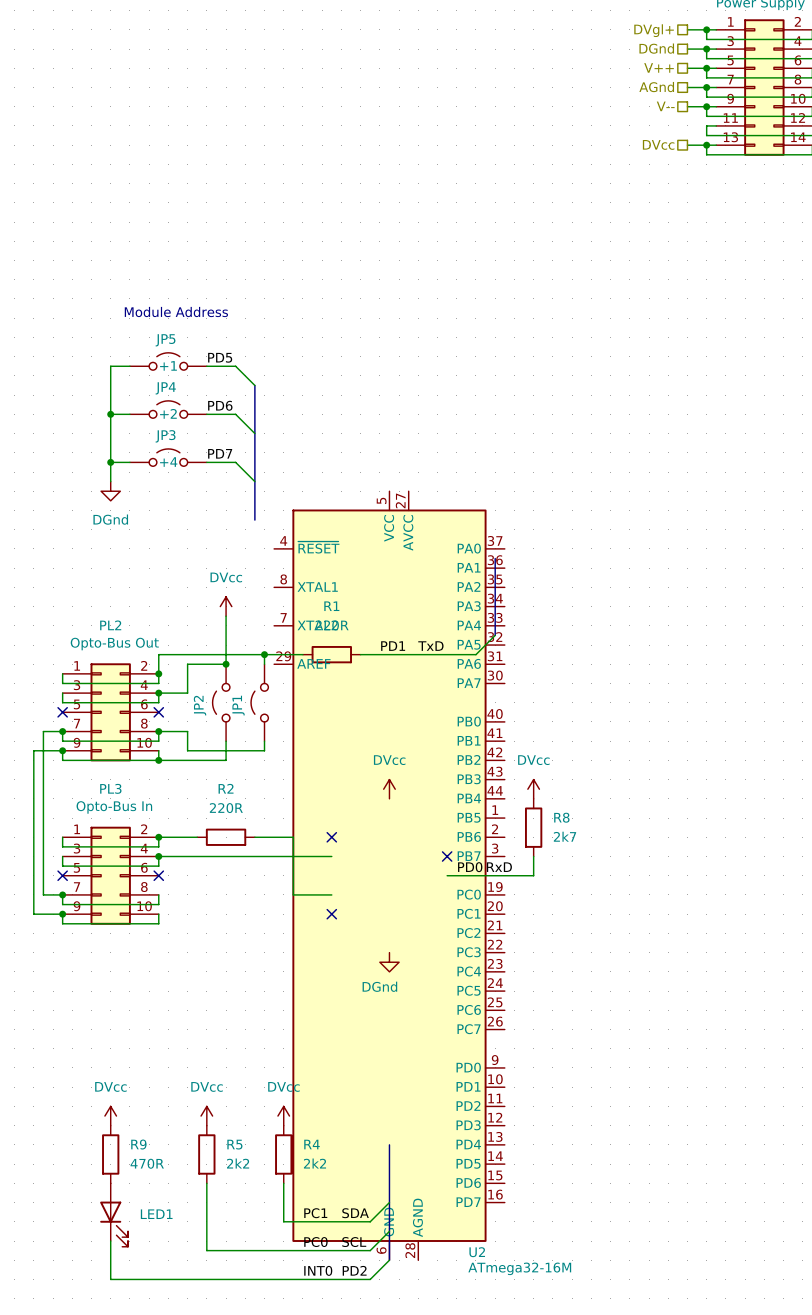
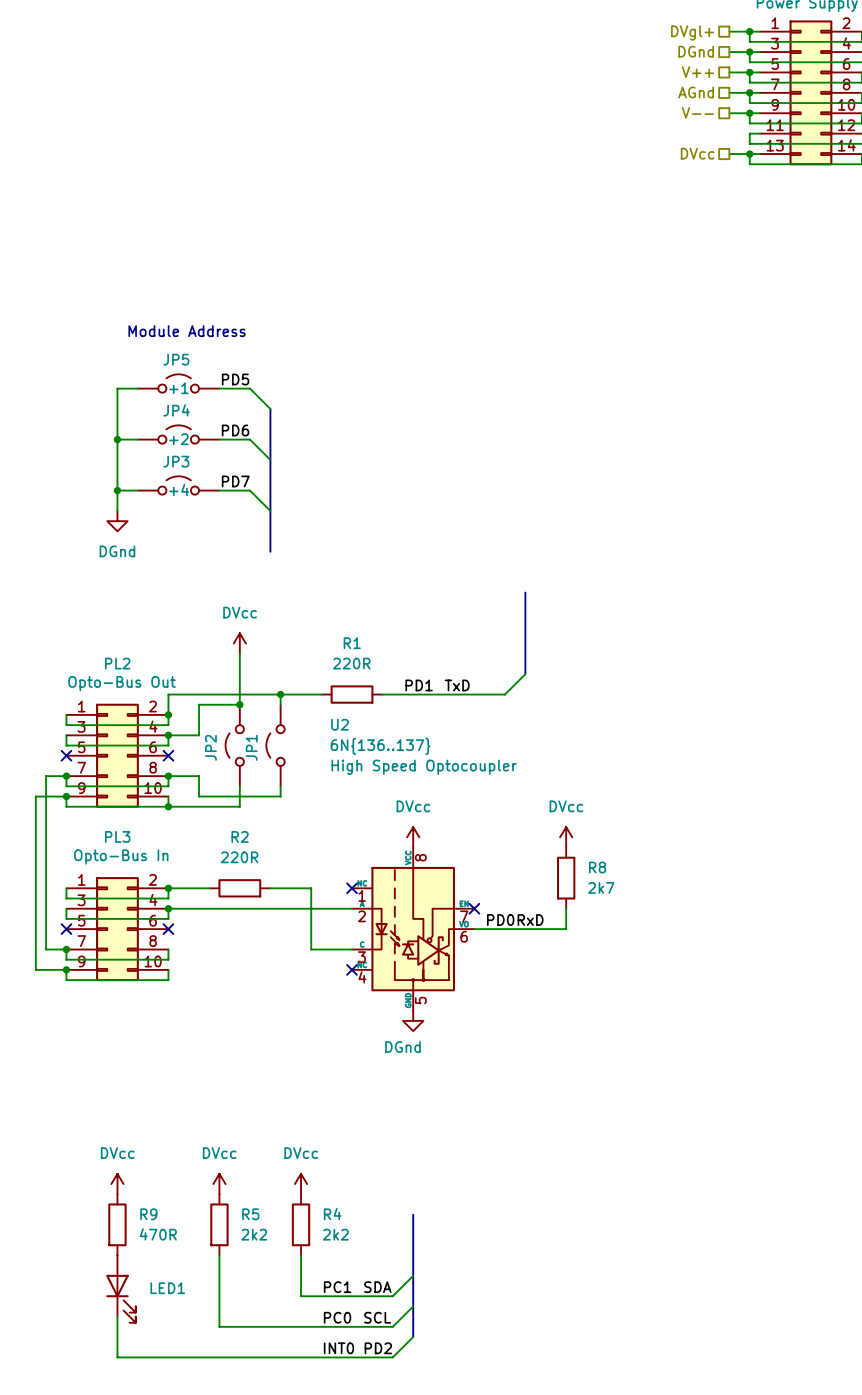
U2 symbol: [274, 491, 505, 1261] -> [352, 847, 475, 1011]
U2 text: none -> High Speed Optocoupler (424, 767)
U2 name position: U2 (477, 1252) -> U2 (340, 724)
U2 value: ATmega32-16M (519, 1268) -> 6N{136..137} (380, 746)

